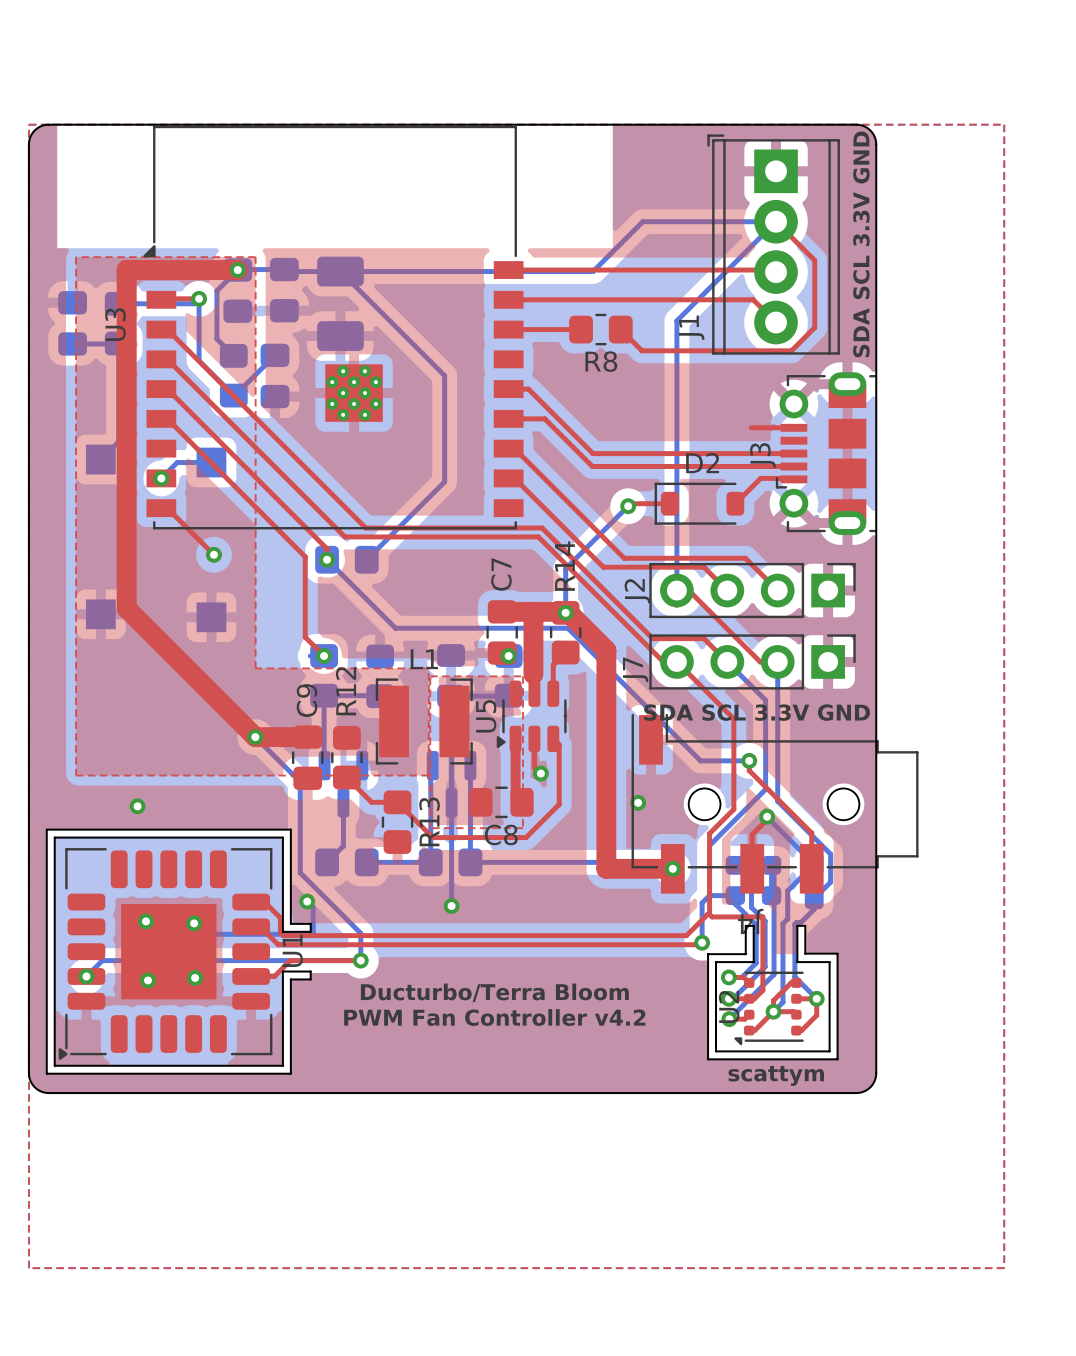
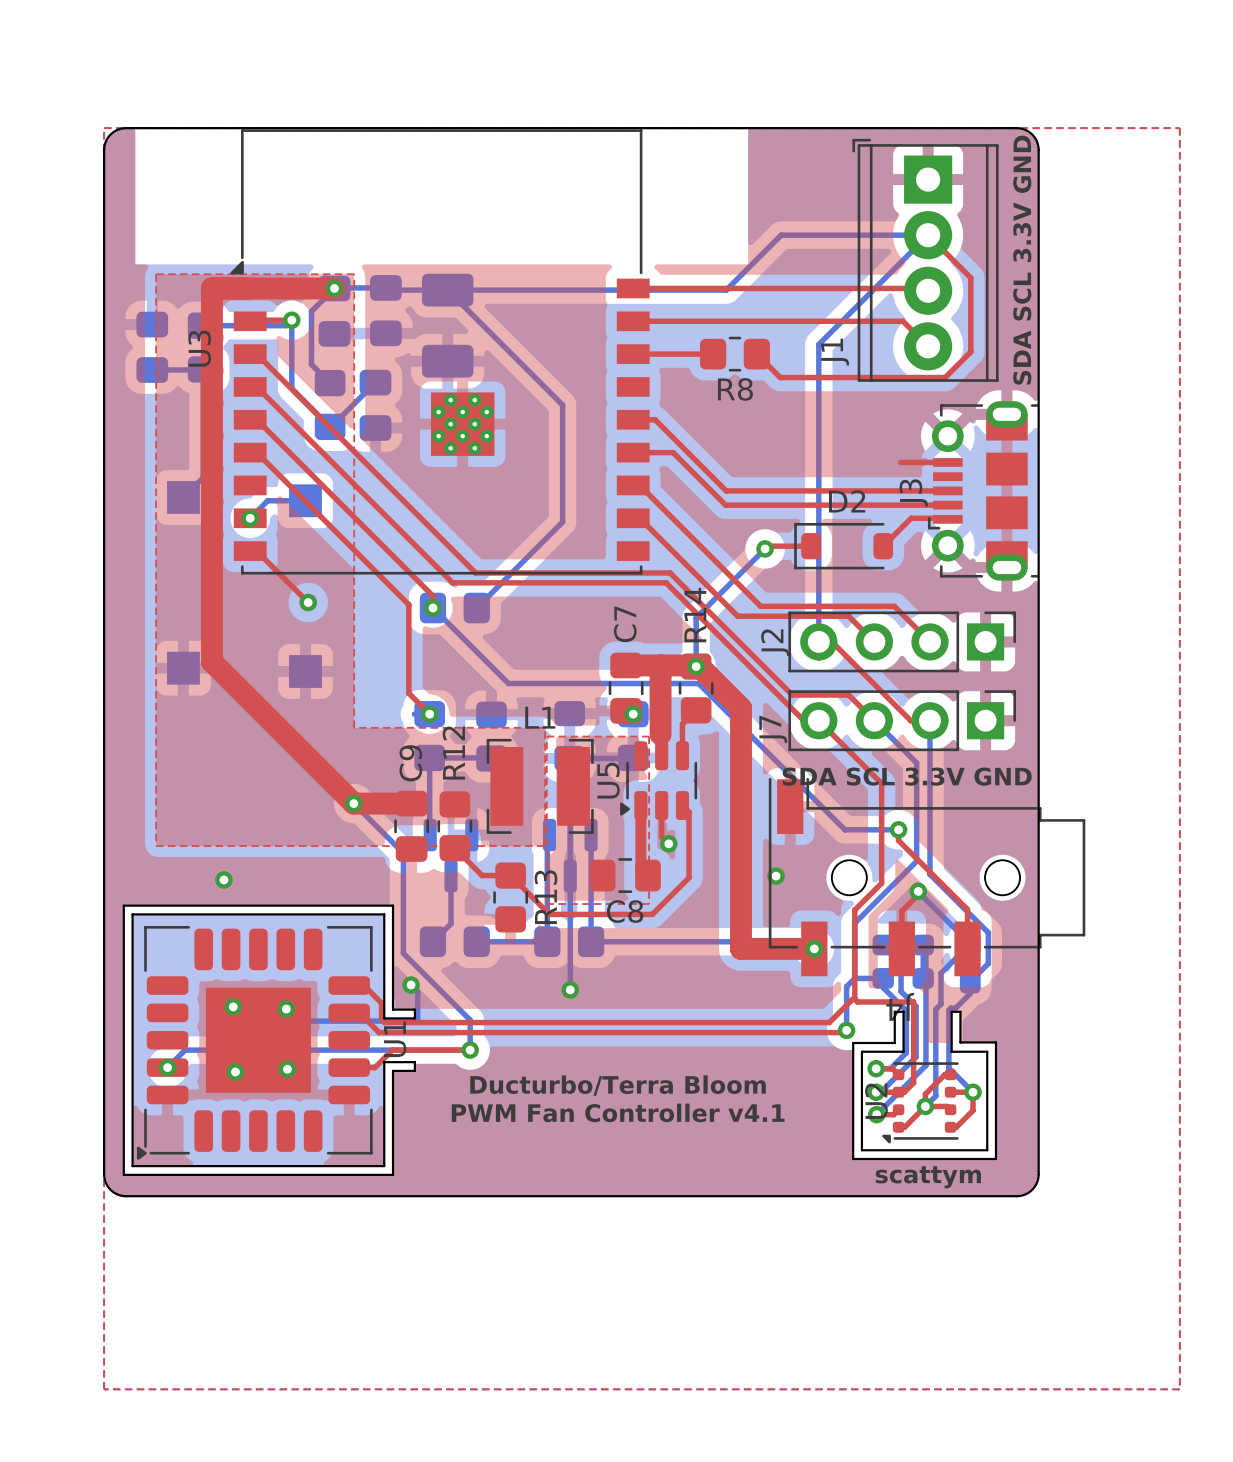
text: PWM Fan Controller v4.2 (494, 1017) -> PWM Fan Controller v4.1 (618, 1112)

